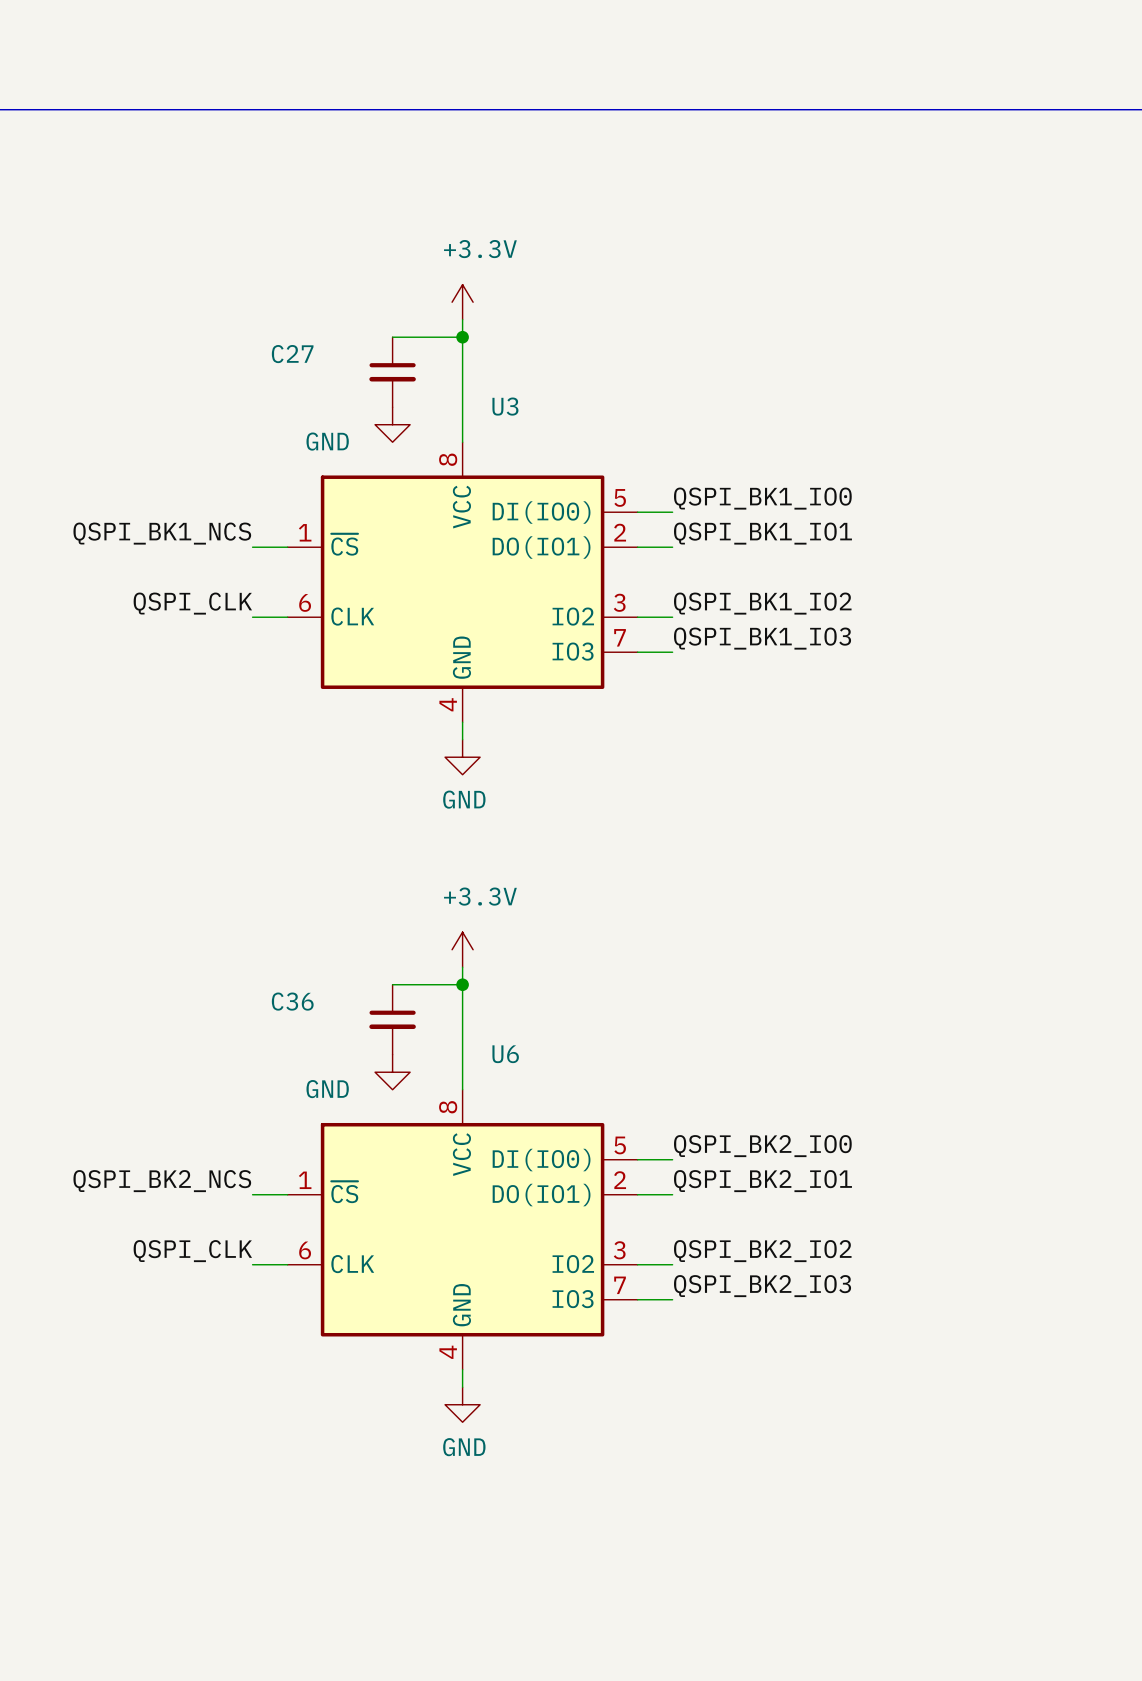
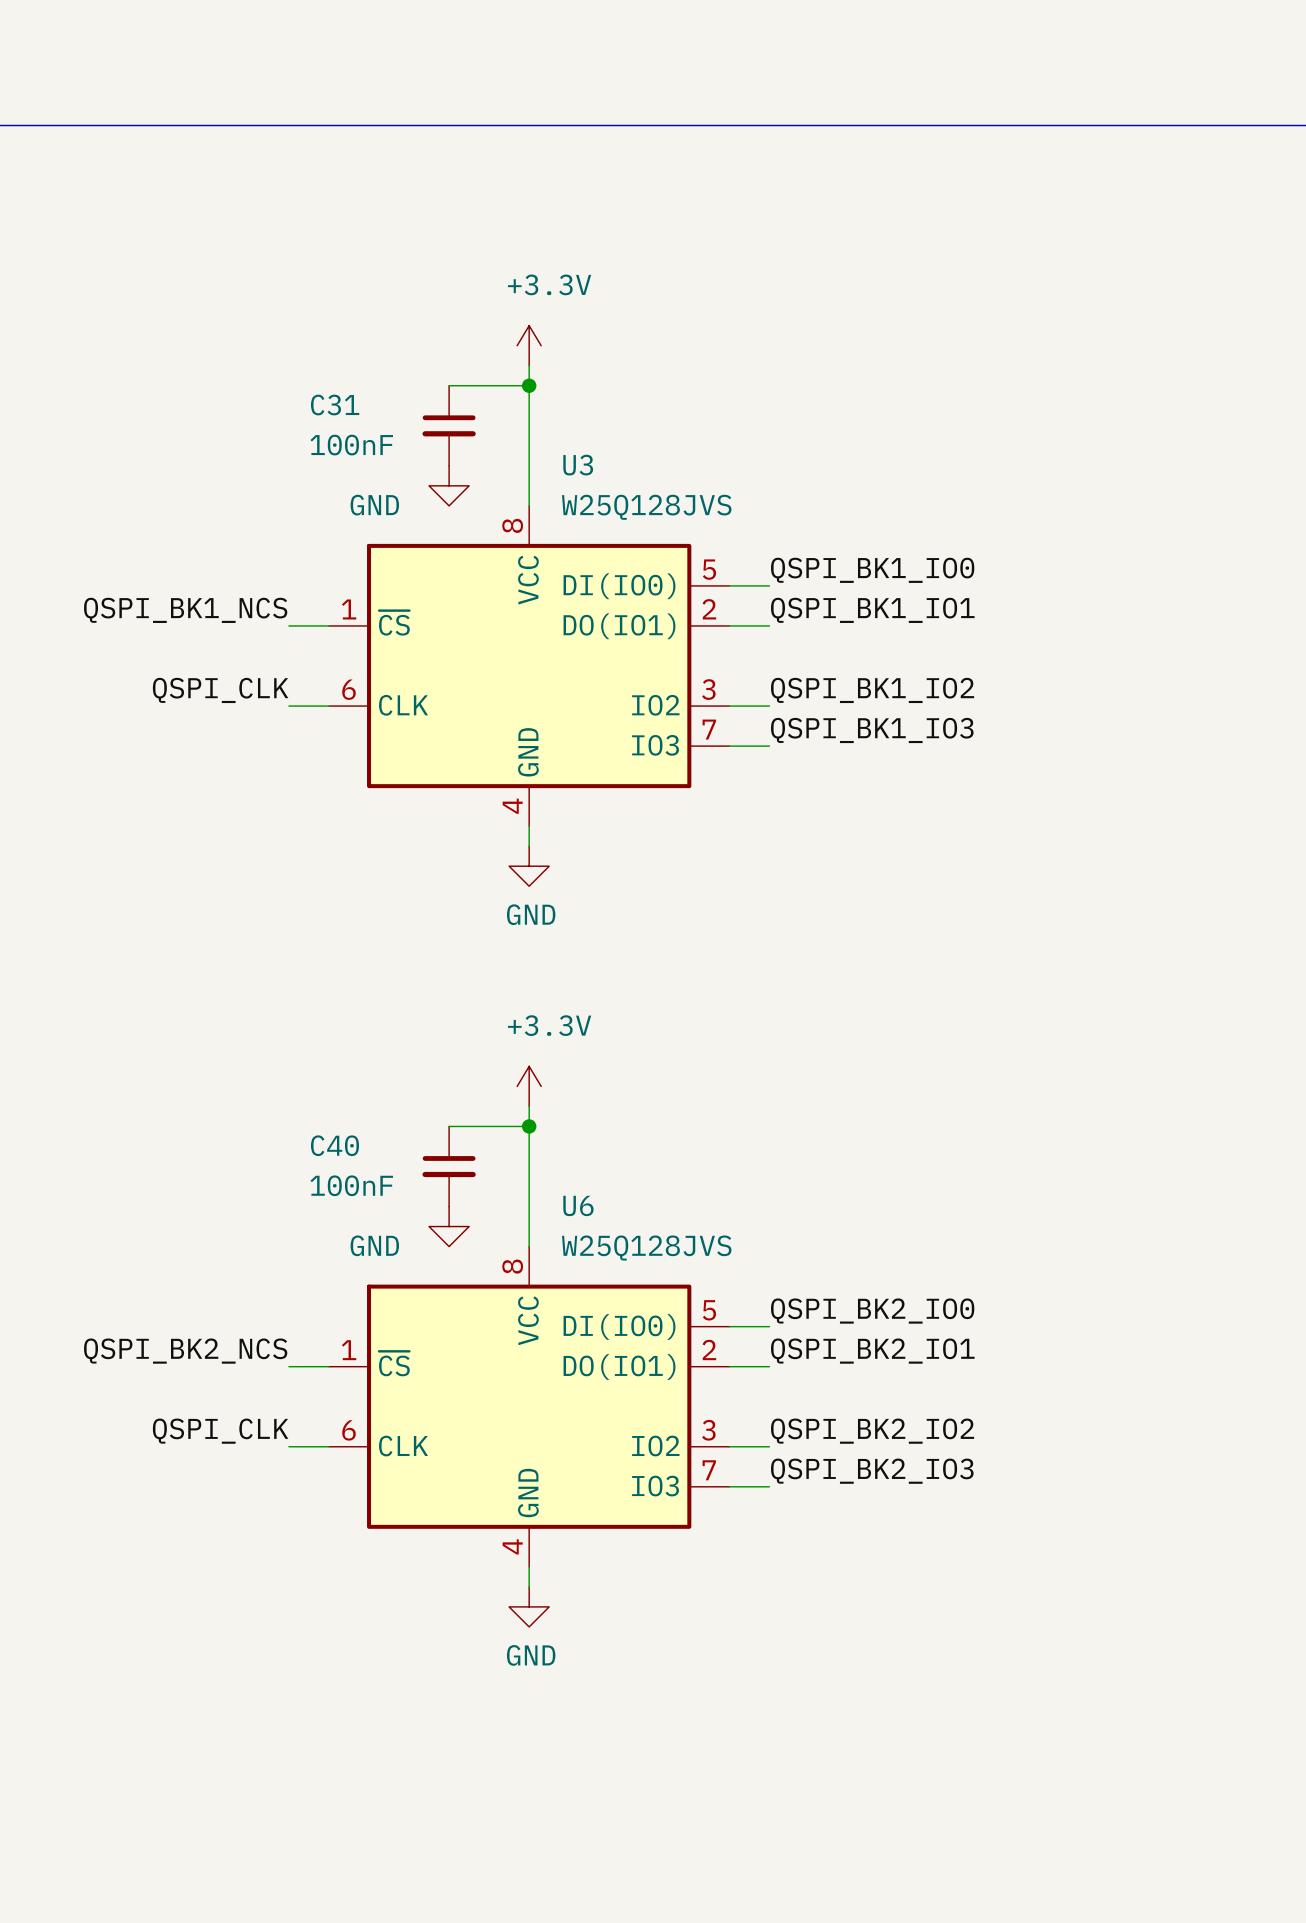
C27 name: C27 (292, 354) -> C31 (335, 405)
C27 value: none -> 100nF (351, 445)
U3 value: none -> W25Q128JVS (646, 507)
C36 name: C36 (292, 1001) -> C40 (334, 1145)
C36 value: none -> 100nF (351, 1185)
U6 value: none -> W25Q128JVS (646, 1248)

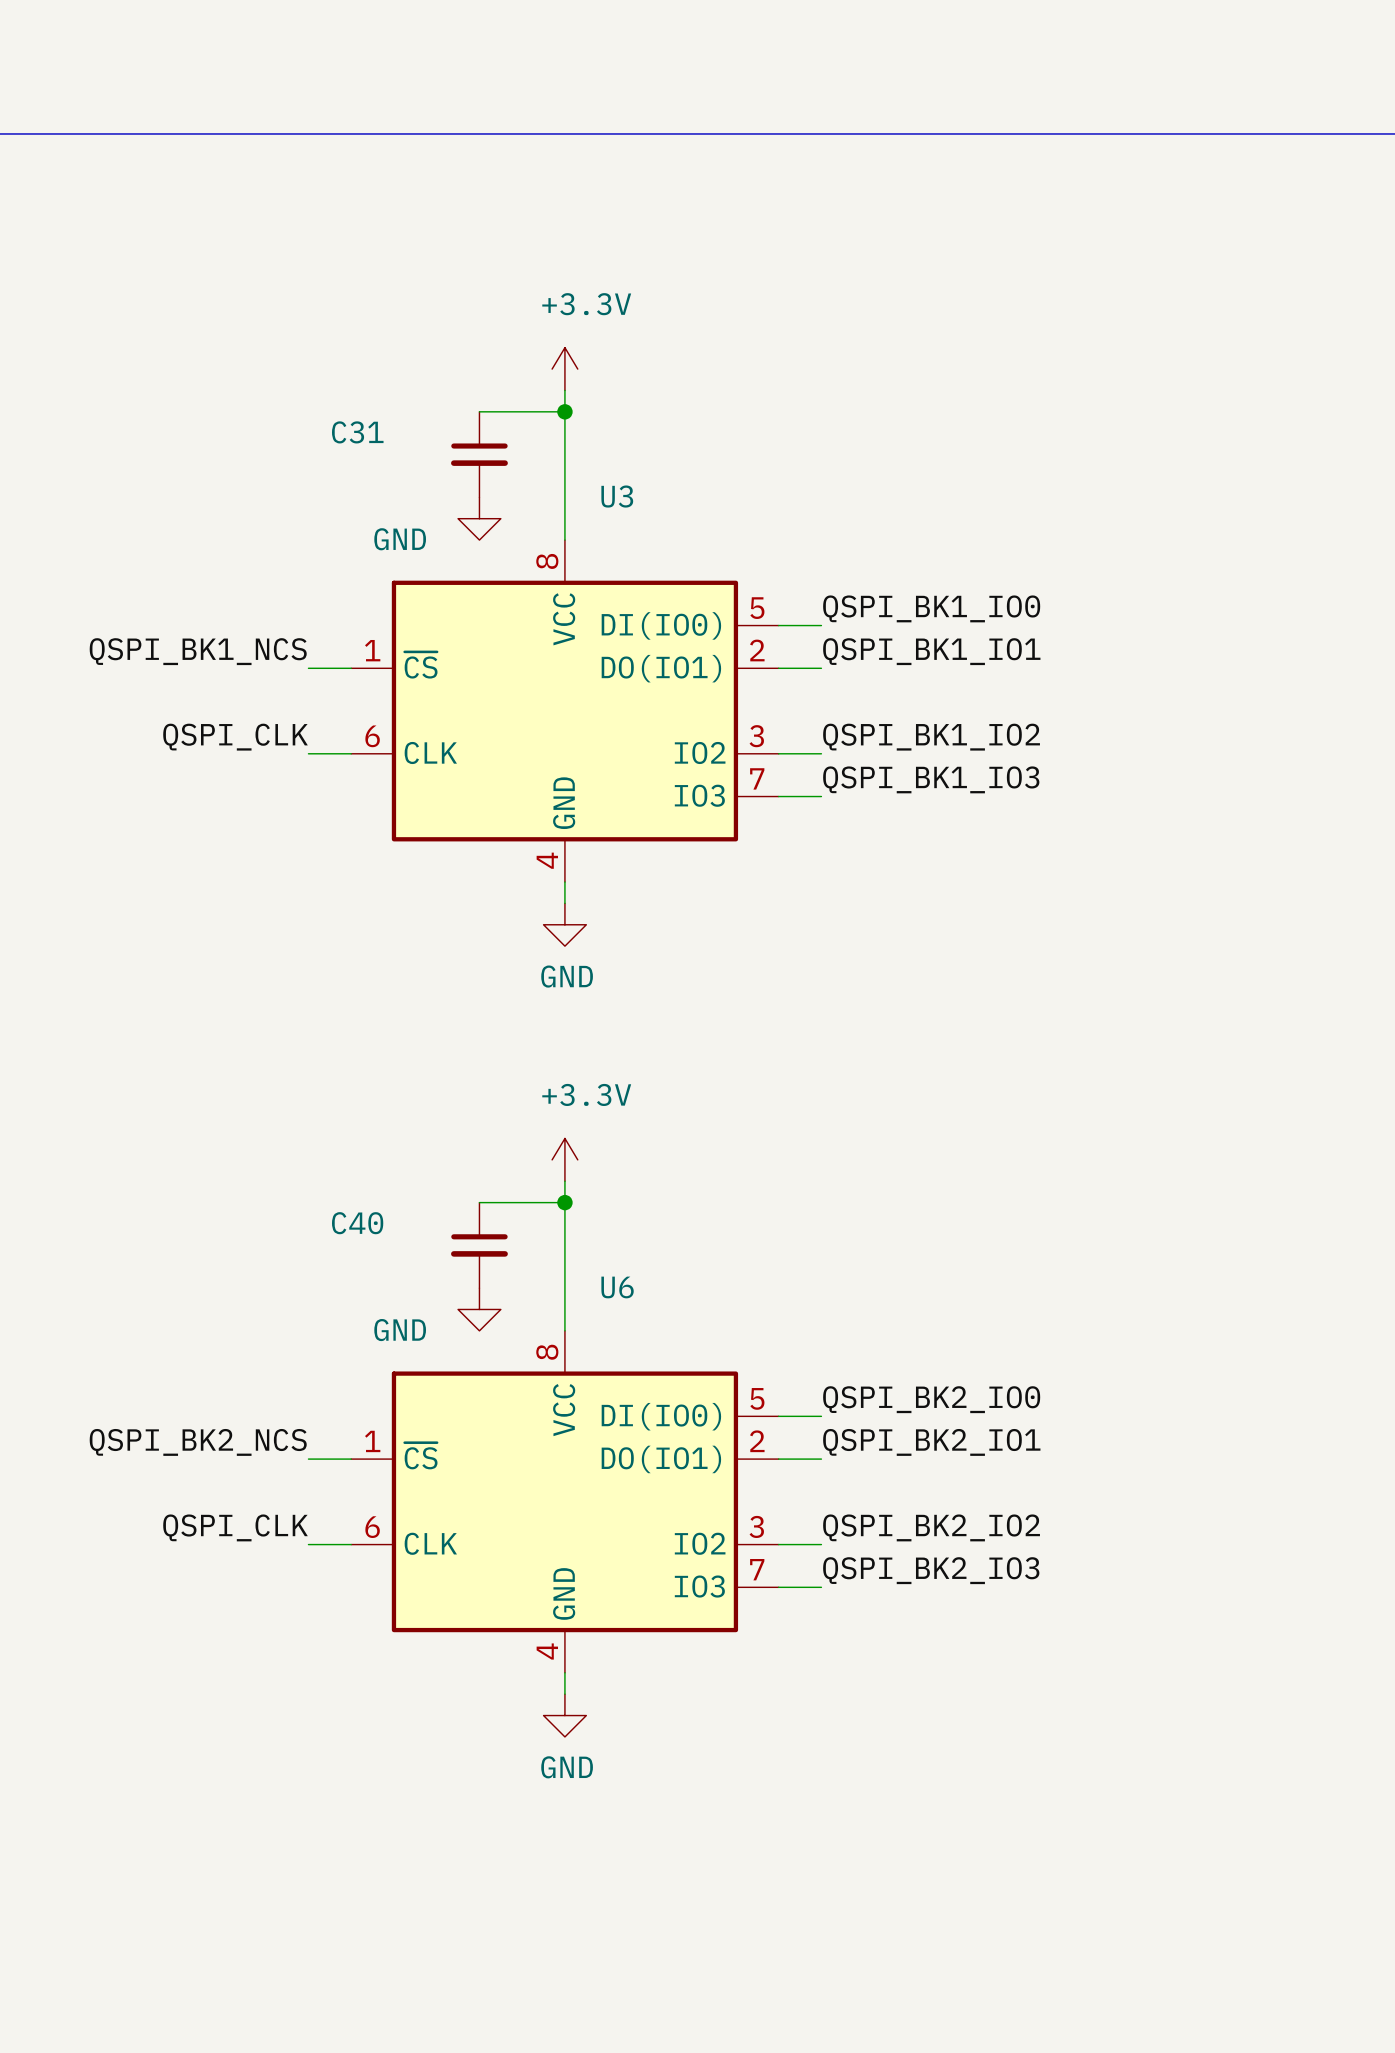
C31 value: 100nF (351, 445) -> none
U3 value: W25Q128JVS (646, 507) -> none
C40 value: 100nF (351, 1185) -> none
U6 value: W25Q128JVS (646, 1248) -> none

